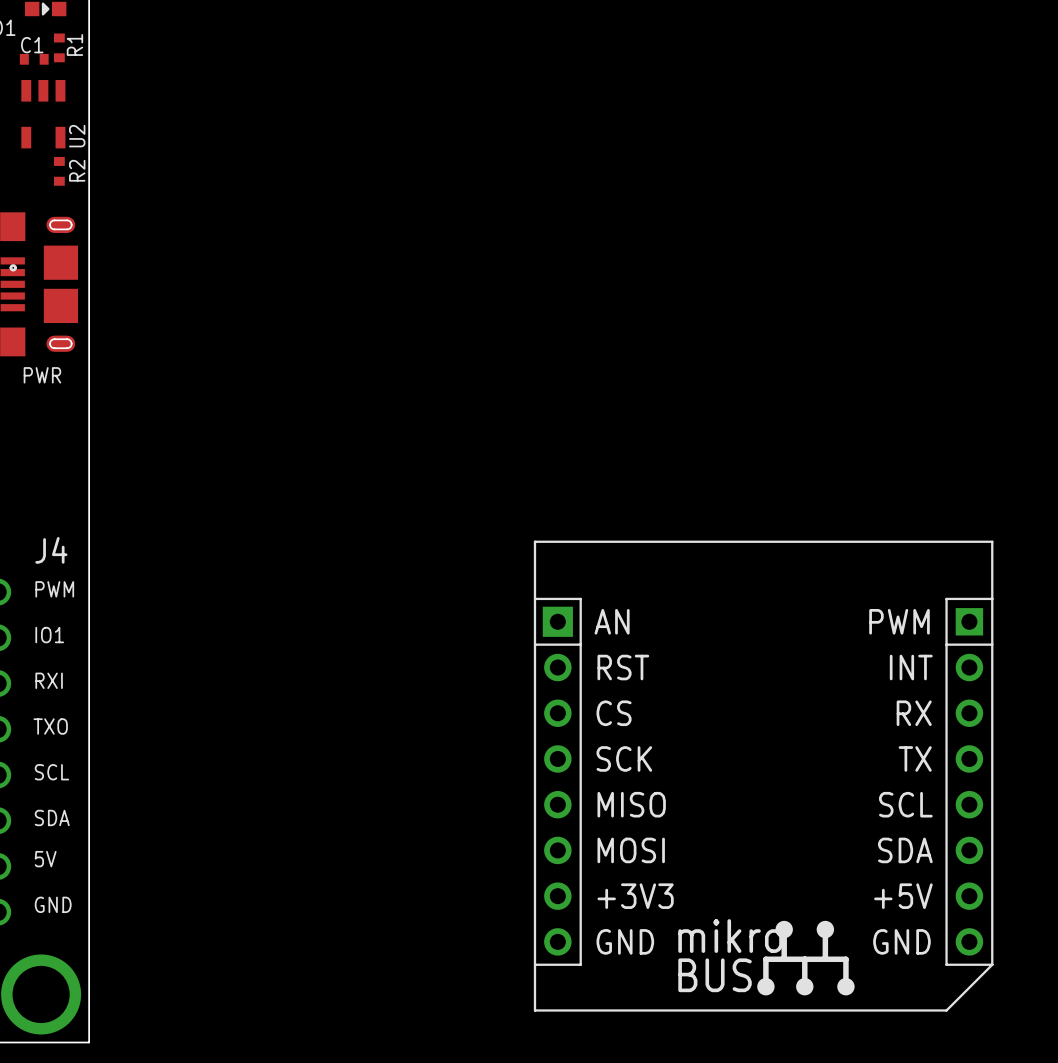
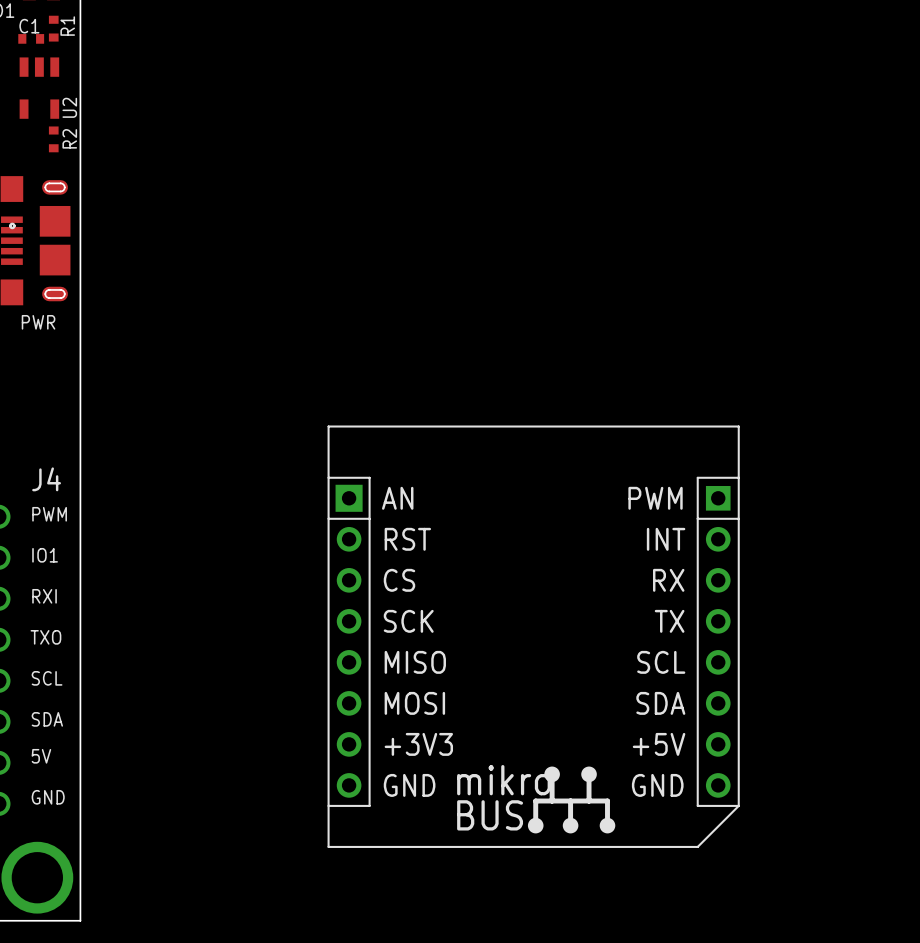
part position: (763, 776) -> (533, 636)

